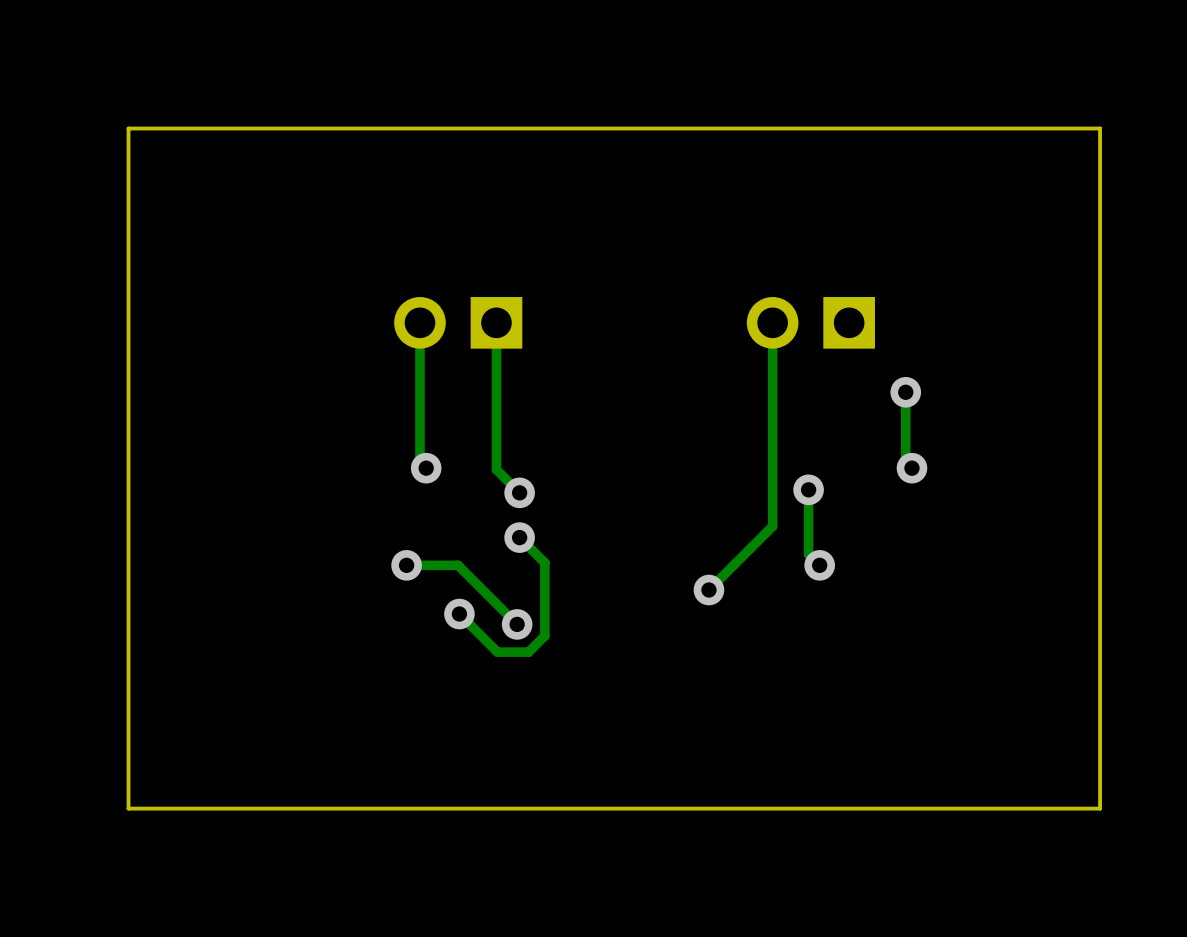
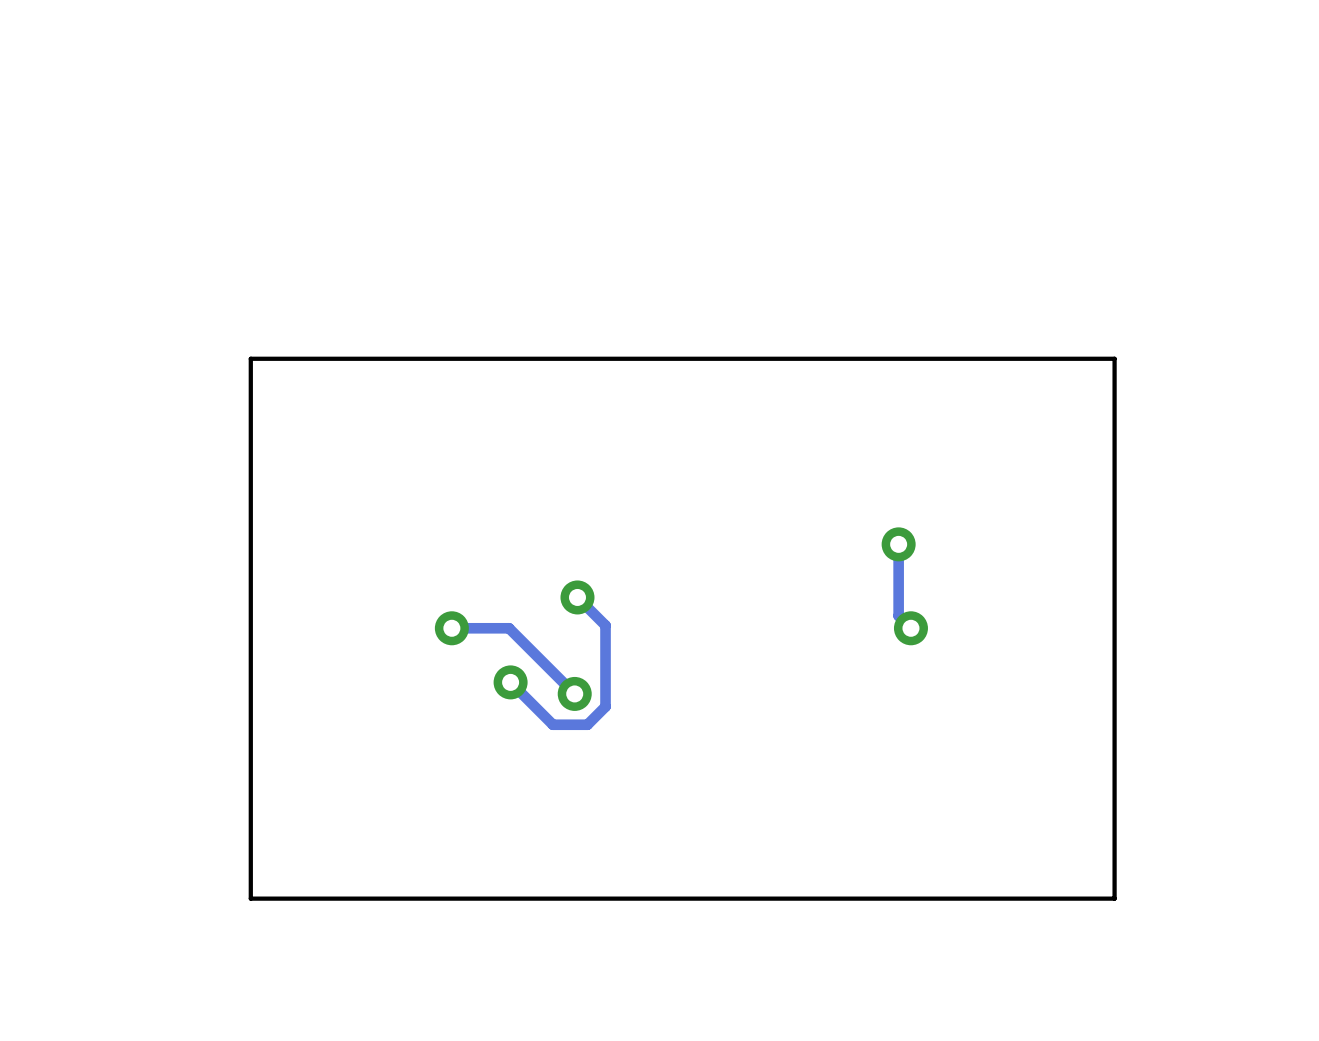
track: (419, 322) (419, 461) (426, 468) -> none
part: (458, 322) -> none
track: (496, 322) (496, 469) (519, 492) -> none
track: (772, 322) (772, 526) (708, 590) -> none
part: (810, 322) -> none
track: (905, 392) (905, 461) (911, 468) -> none
via: (905, 392) -> none
via: (426, 468) -> none
via: (911, 468) -> none
via: (519, 492) -> none
via: (708, 590) -> none
board edge: (1002, 808) (1100, 808) (1100, 128) (128, 128) (128, 808) (225, 808) -> (1114, 898) (1114, 358) (250, 358) (250, 898)

